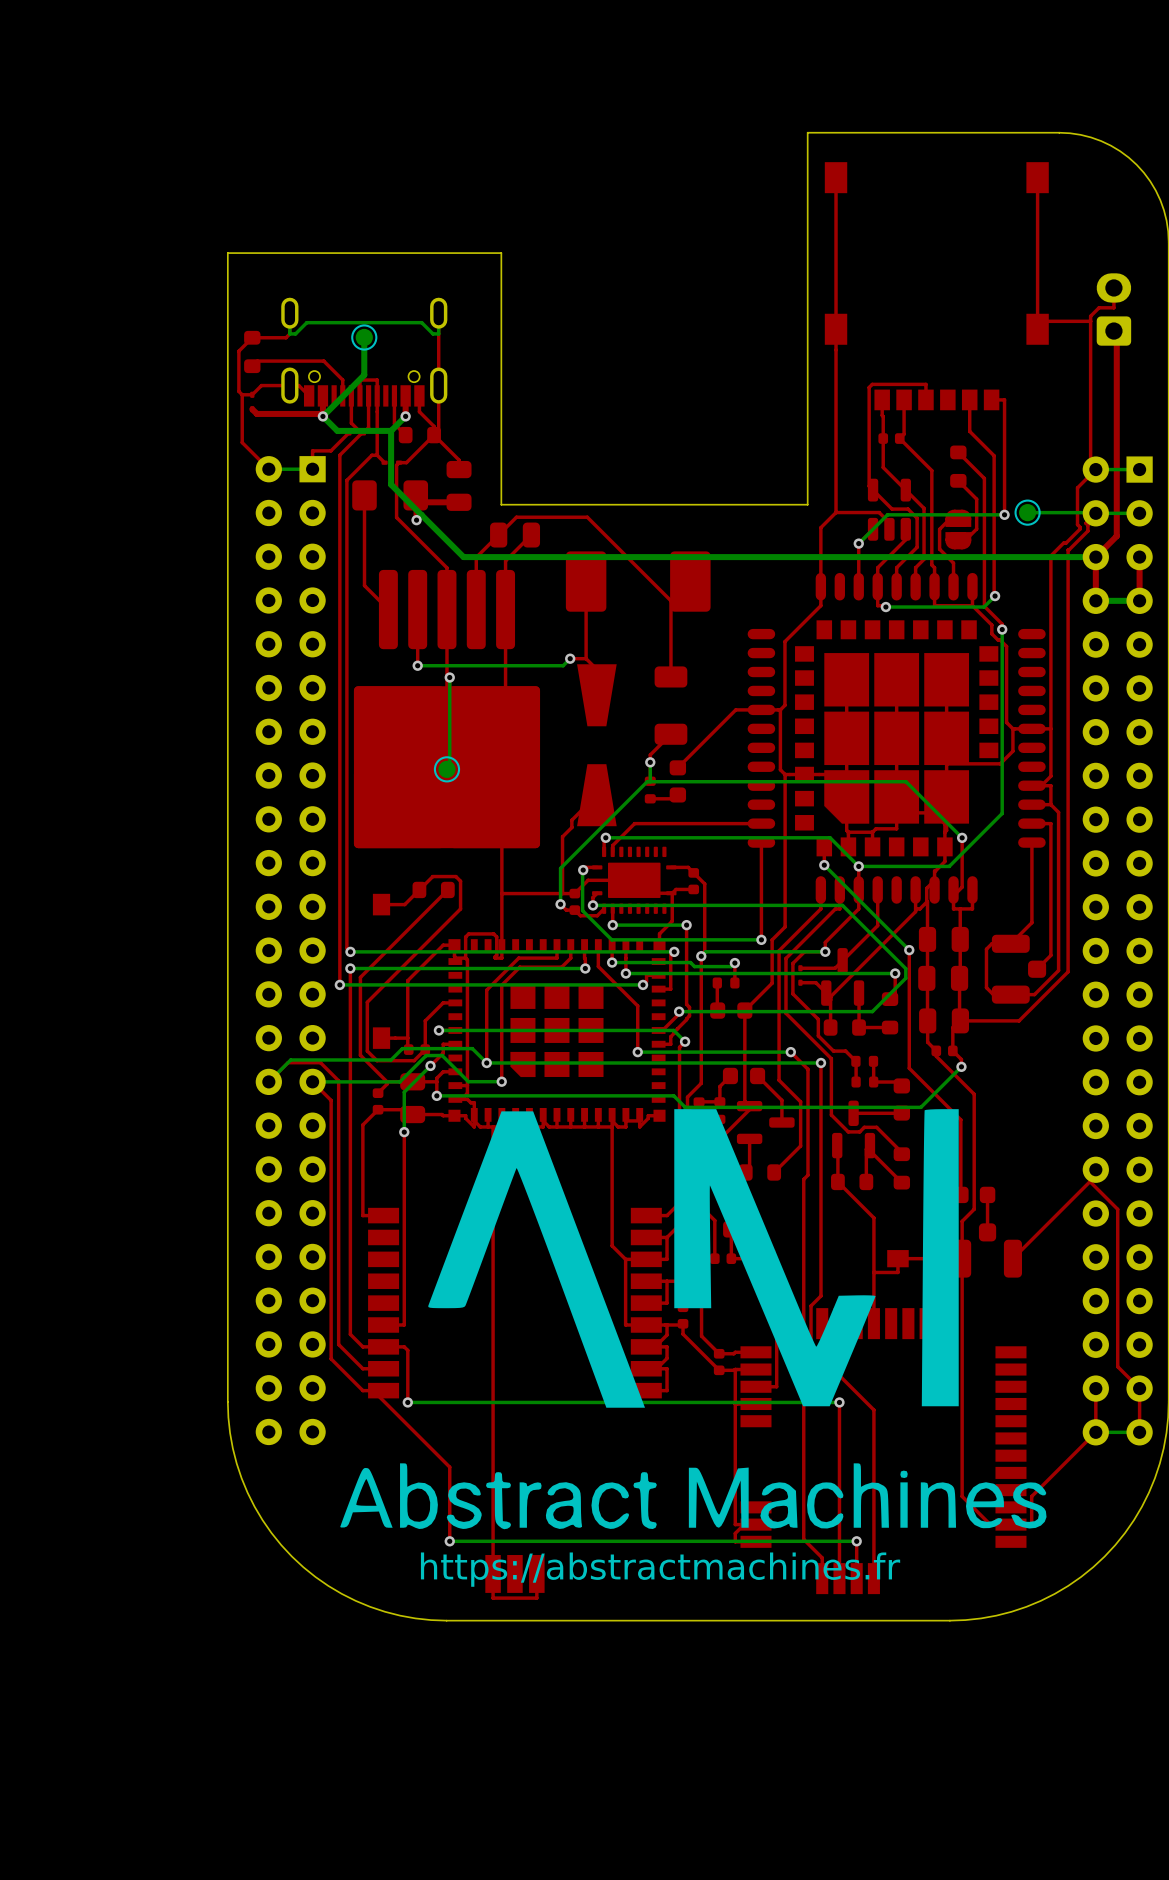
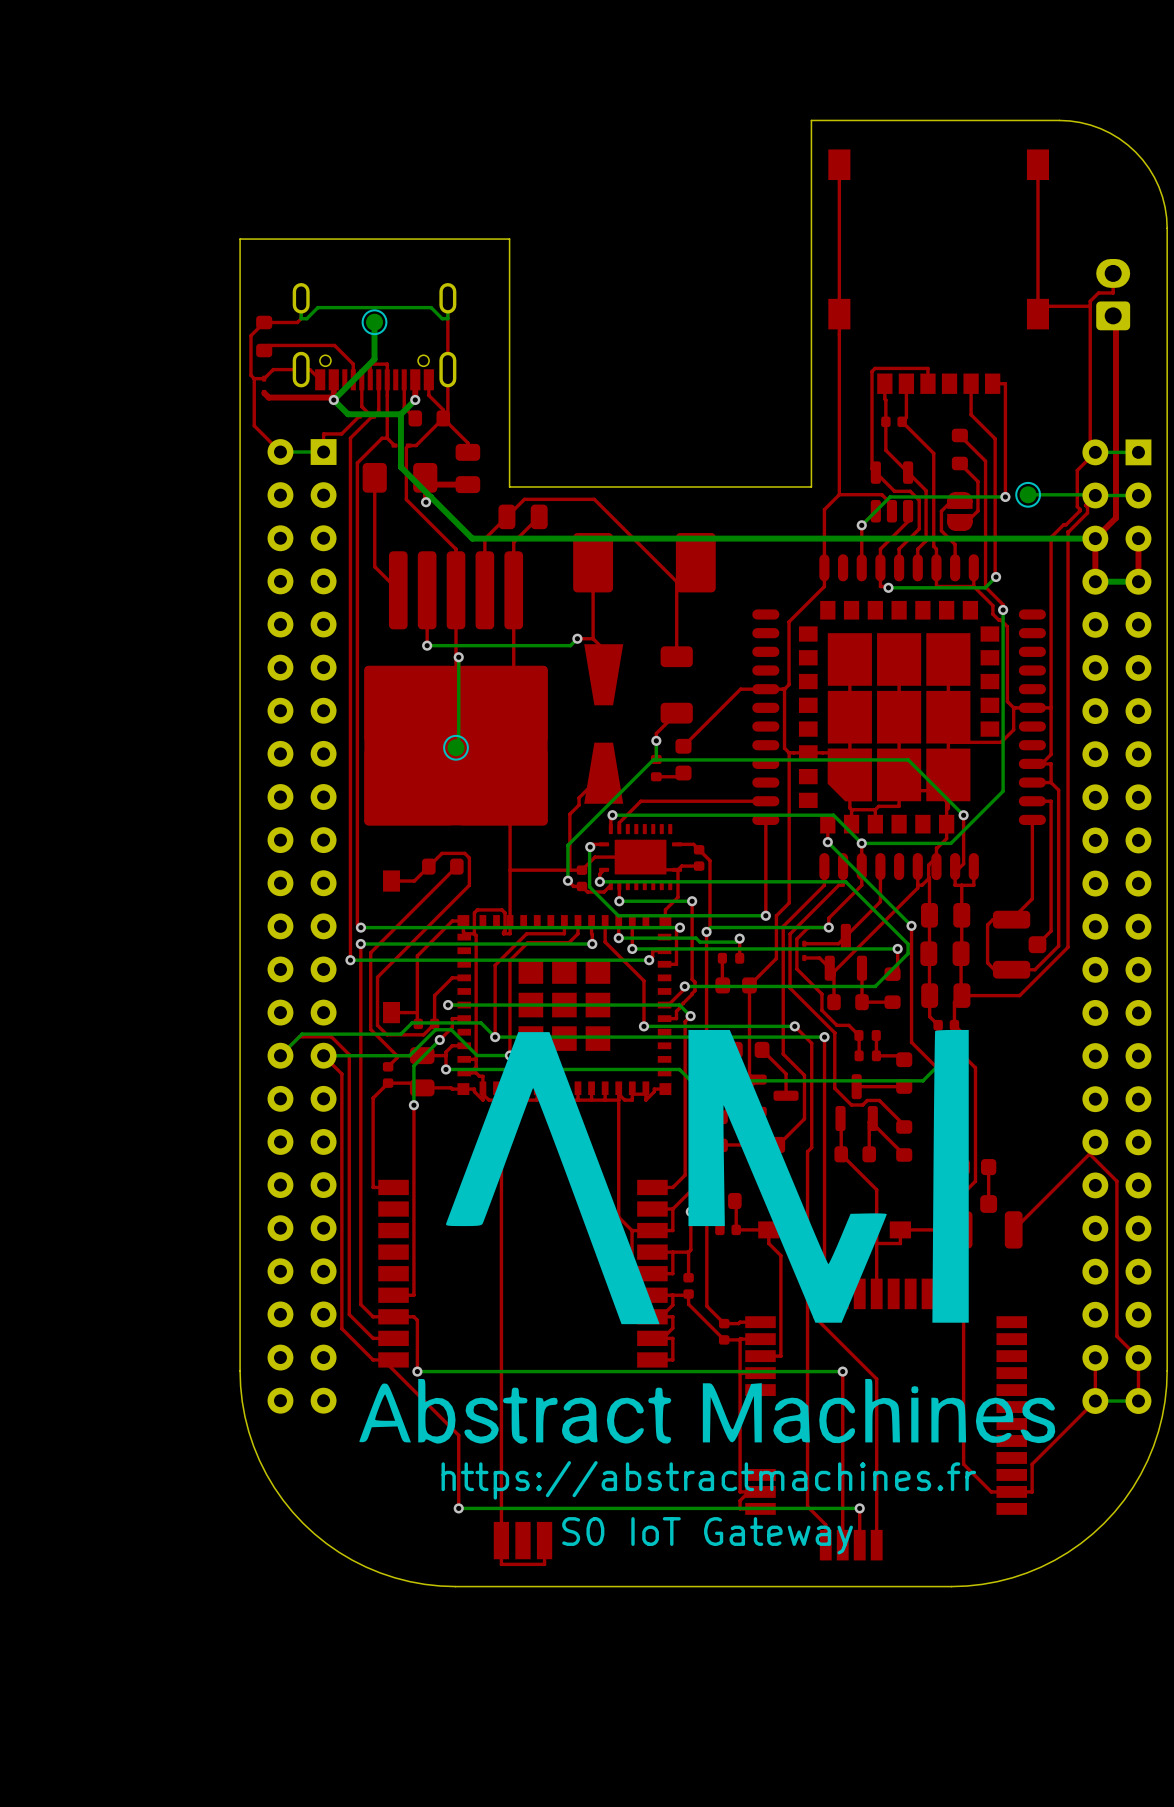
drawing position: (693, 1319) -> (707, 1236)
text: none -> S0 IoT Gateway (707, 1535)
text position: https://abstractmachines.fr (660, 1569) -> https://abstractmachines.fr (708, 1480)

